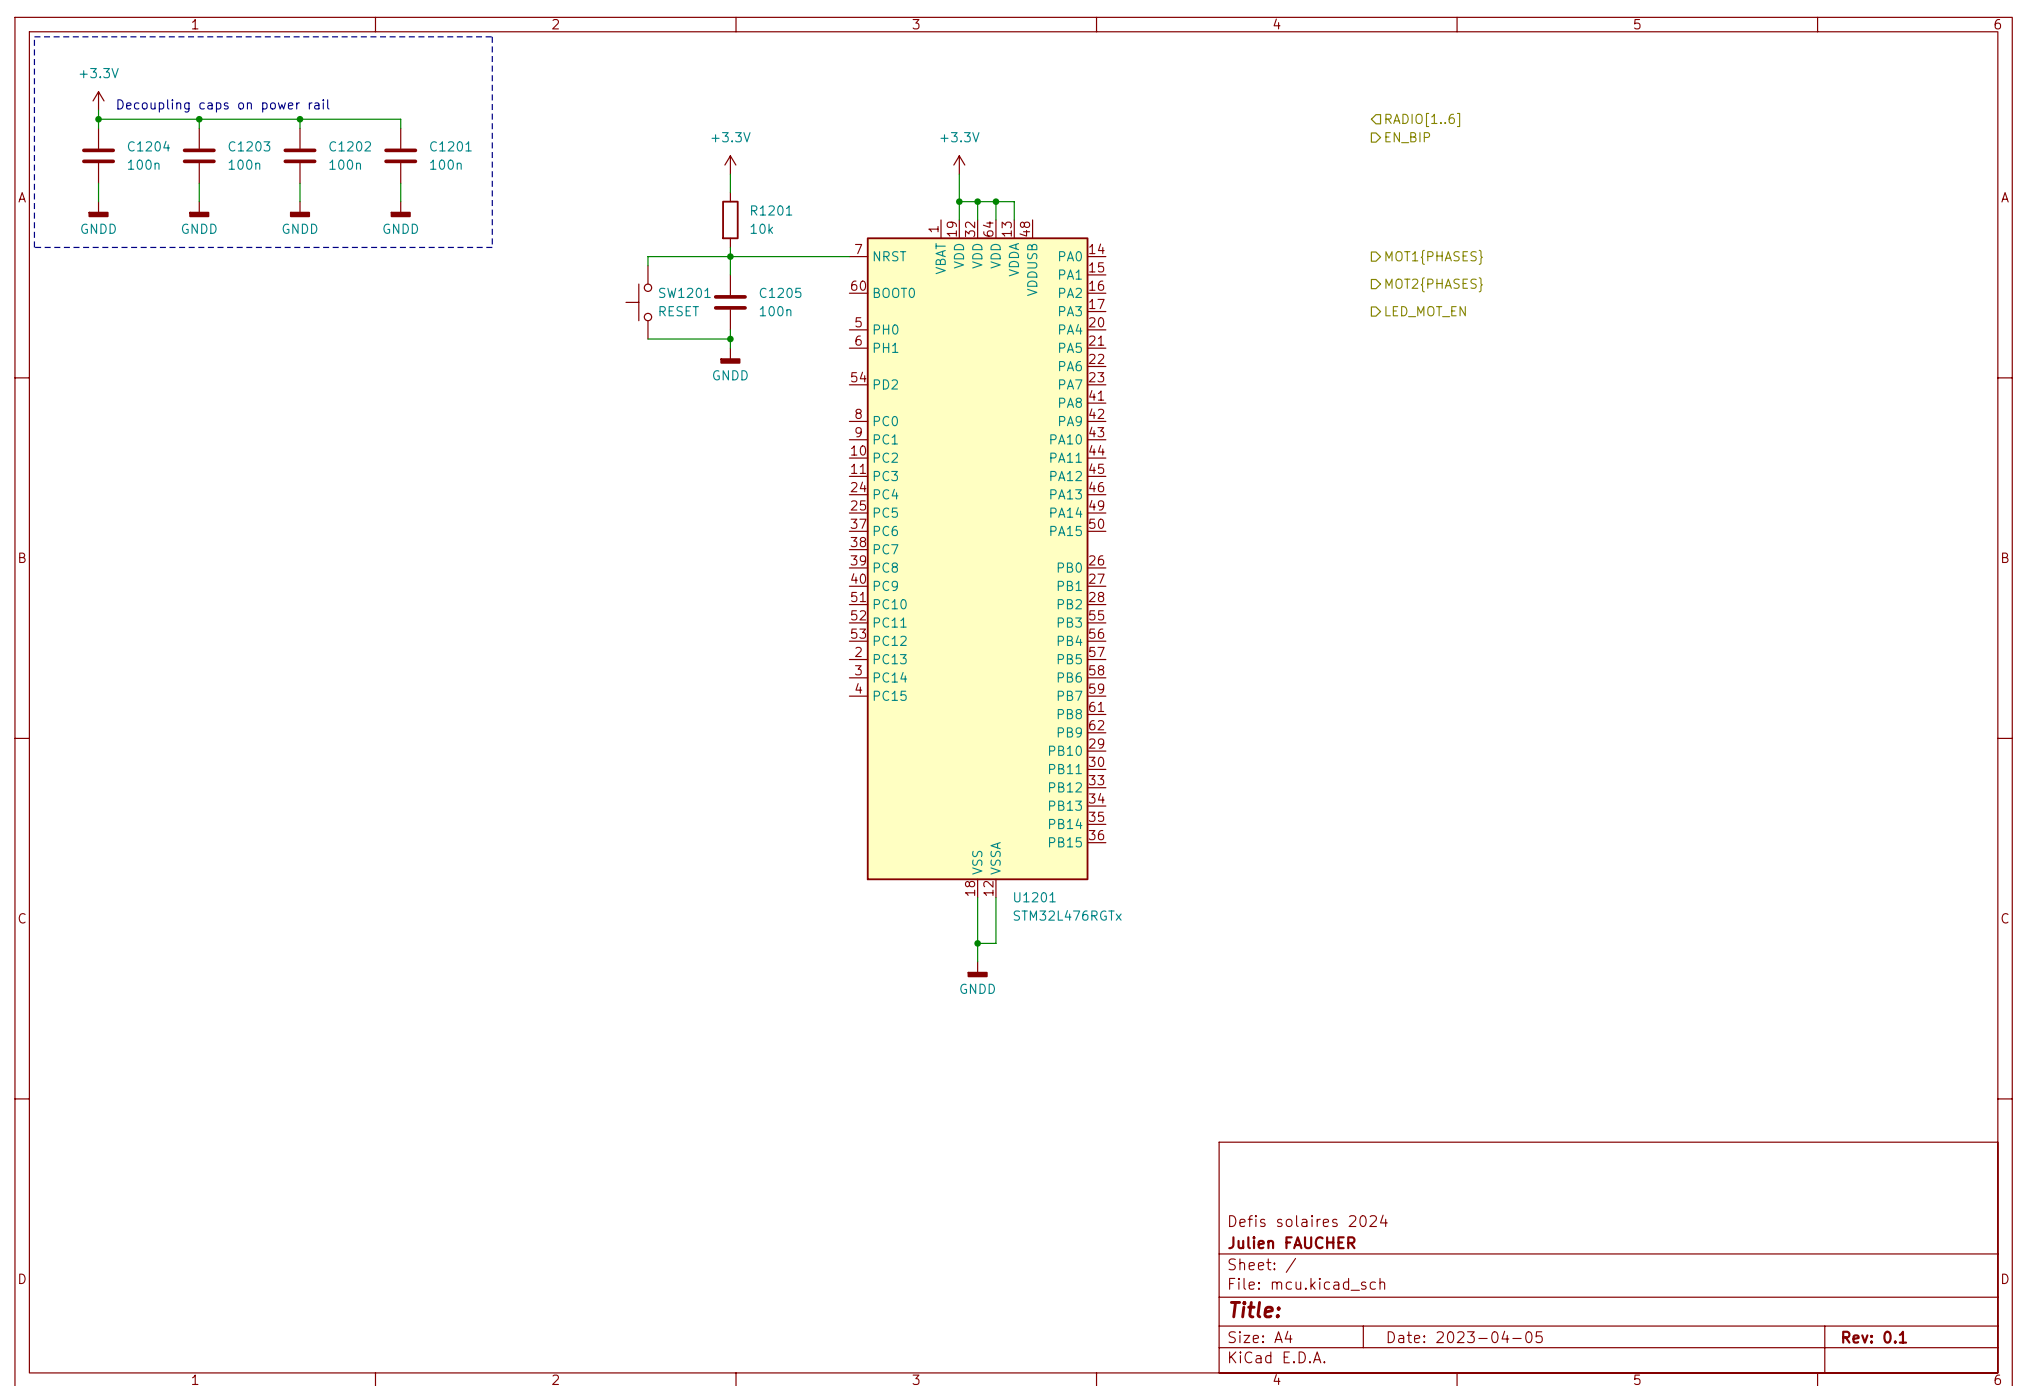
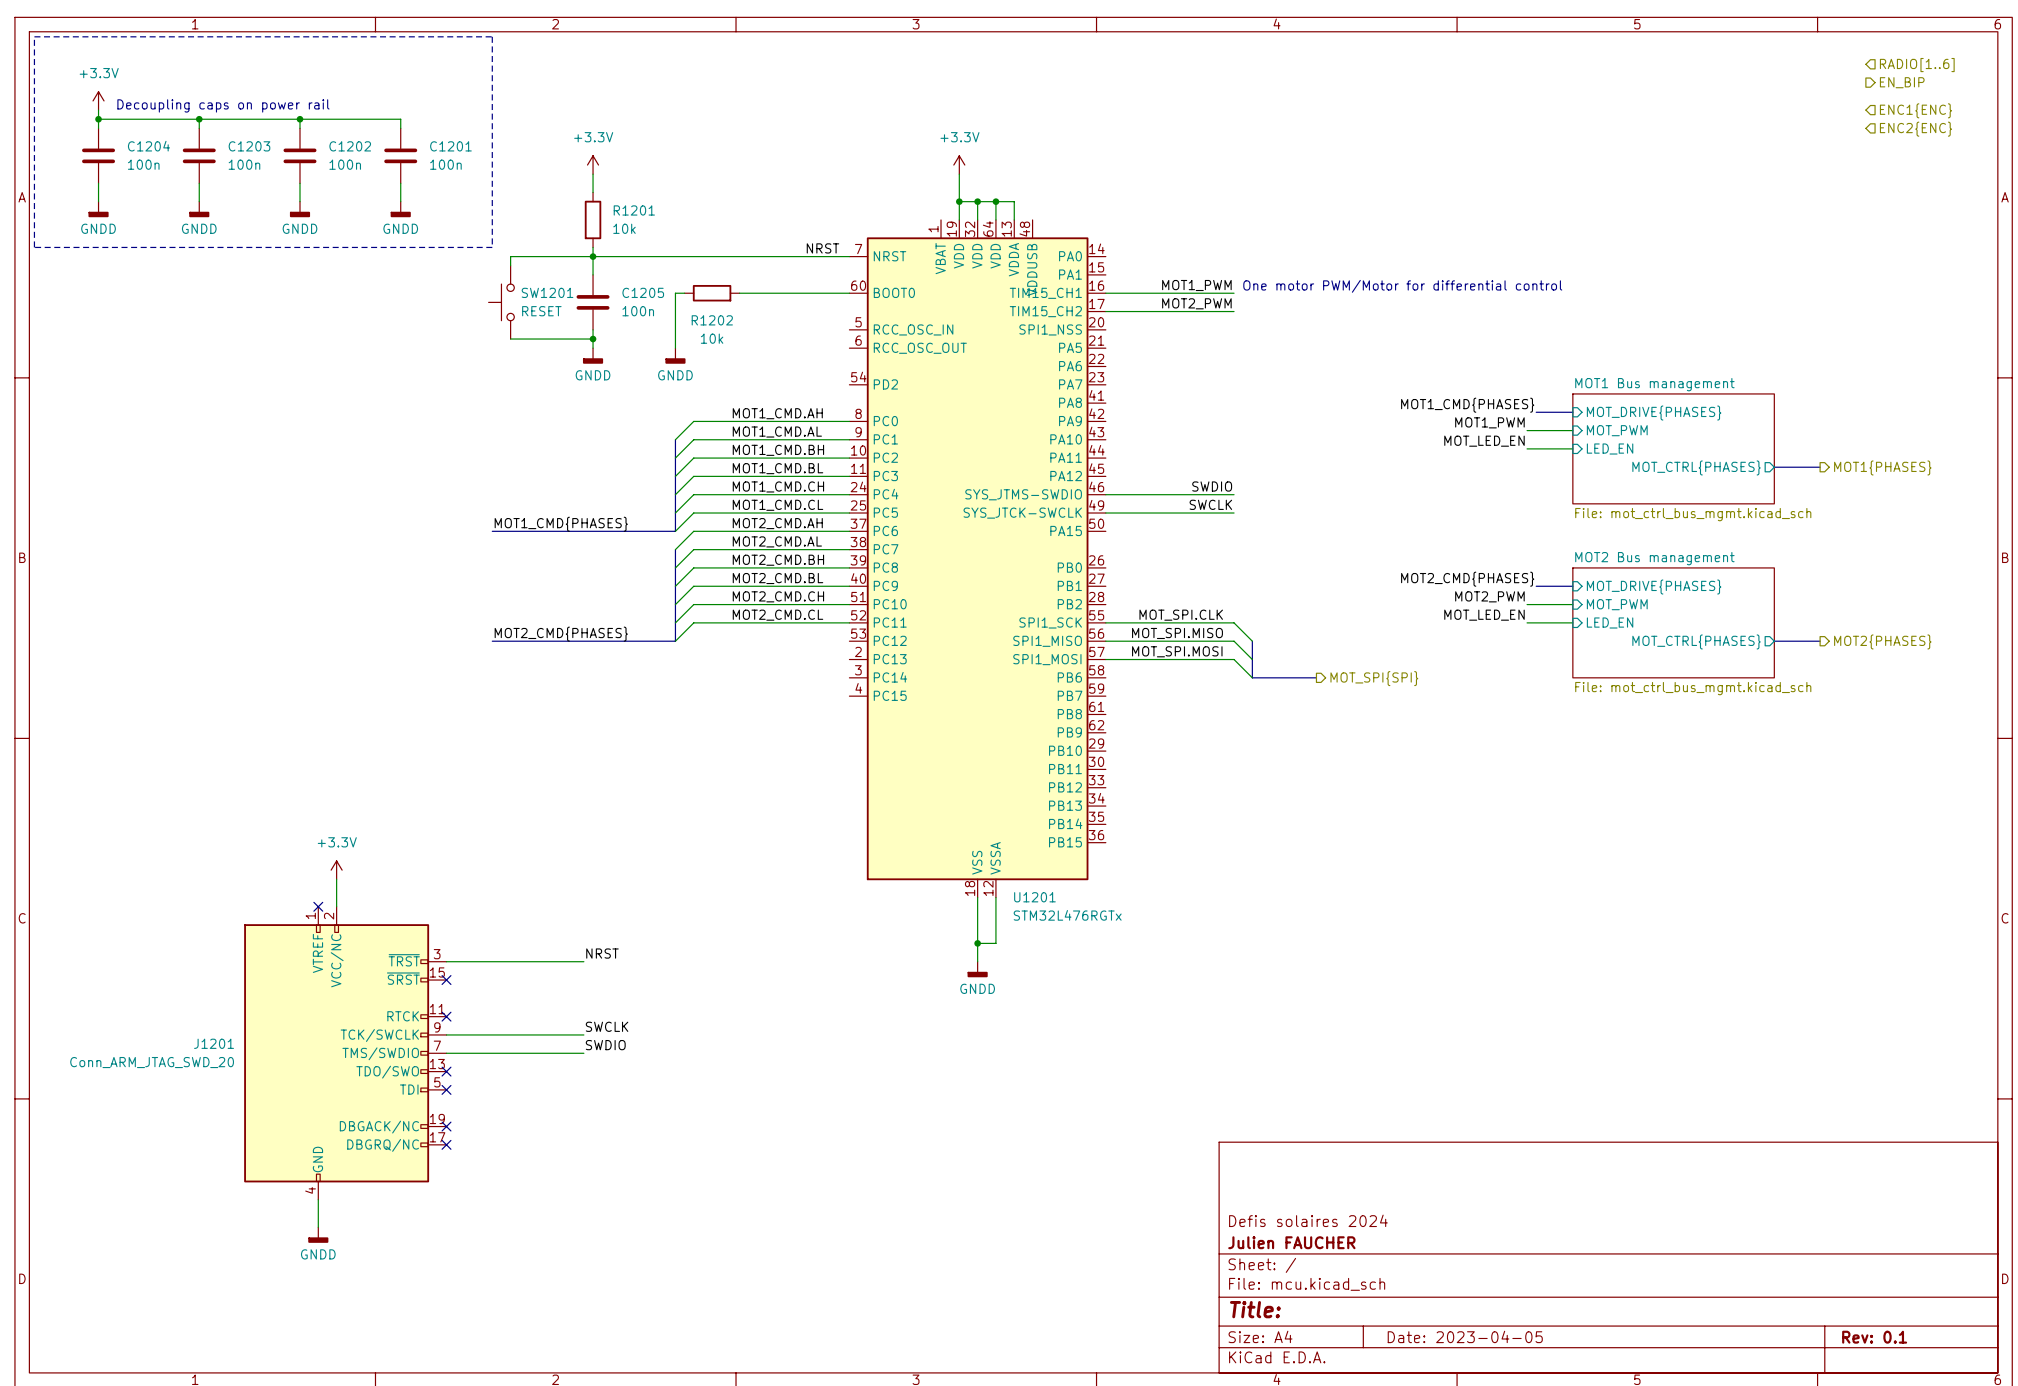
hierarchical label: none -> RADIO[1..6] (1917, 65)
hierarchical label: none -> EN_BIP (1902, 82)
hierarchical label: none -> ENC1{ENC} (1915, 110)
hierarchical label: RADIO[1..6] (1422, 119) -> none
hierarchical label: none -> ENC2{ENC} (1915, 129)
hierarchical label: EN_BIP (1407, 137) -> none
power symbol position: +3.3V (730, 165) -> +3.3V (593, 165)
wire: (730, 174) (730, 192) -> (593, 174) (593, 192)
R1201 position: (730, 219) -> (593, 219)
U1201 symbol: [849, 219, 1106, 898] -> [849, 219, 1106, 898]
wire: (730, 247) (730, 274) -> (593, 247) (593, 274)
label: none -> NRST (822, 248)
junction: none -> (593, 256)
wire: (647, 256) (647, 265) -> (647, 256) (510, 256) (510, 265)
junction: (730, 256) -> none
hierarchical label: MOT1{PHASES} (1434, 257) -> none
hierarchical label: MOT2{PHASES} (1434, 284) -> none
label: none -> MOT1_PWM (1196, 285)
text: none -> One motor PWM/Motor for differential control (1402, 286)
wire: none -> (684, 293) (675, 293) (675, 348)
R1202: none -> 10k (712, 293)
wire: none -> (739, 293) (849, 293)
wire: none -> (1105, 293) (1234, 293)
SW1201 position: (638, 302) -> (501, 302)
C1205 position: (730, 302) -> (593, 302)
label: none -> MOT2_PWM (1196, 303)
wire: none -> (1105, 311) (1234, 311)
hierarchical label: LED_MOT_EN (1425, 311) -> none
wire: (730, 329) (730, 348) -> (593, 329) (593, 348)
junction: none -> (593, 339)
wire: (647, 339) (730, 339) -> (510, 339) (593, 339)
junction: (730, 339) -> none
power symbol: none -> GNDD (593, 355)
power symbol position: GNDD (730, 355) -> GNDD (675, 355)
label: none -> MOT1_CMD{PHASES} (1467, 405)
bus: none -> (1536, 412) (1572, 412)
label: none -> MOT1_CMD.AH (777, 413)
sheet pin: none -> MOT_DRIVE{PHASES} (1654, 413)
wire: none -> (849, 421) (693, 421) (675, 439)
label: none -> MOT1_PWM (1489, 422)
wire: none -> (1527, 430) (1572, 430)
sheet pin: none -> MOT_PWM (1617, 430)
label: none -> MOT1_CMD.AL (777, 432)
bus: none -> (675, 439) (675, 531) (492, 531)
wire: none -> (849, 439) (693, 439) (675, 458)
label: none -> MOT_LED_EN (1484, 441)
wire: none -> (1527, 448) (1572, 448)
sheet pin: none -> LED_EN (1610, 448)
sheet MOT1 Bus management: none -> File: mot_ctrl_bus_mgmt.kicad_sch (1673, 448)
label: none -> MOT1_CMD.BH (778, 450)
wire: none -> (849, 458) (693, 458) (675, 476)
sheet pin: none -> MOT_CTRL{PHASES} (1696, 467)
bus: none -> (1774, 467) (1820, 467)
hierarchical label: none -> MOT1{PHASES} (1882, 467)
label: none -> MOT1_CMD.BL (777, 468)
wire: none -> (849, 476) (693, 476) (675, 494)
label: none -> MOT1_CMD.CH (778, 486)
label: none -> SWDIO (1212, 486)
wire: none -> (849, 494) (693, 494) (675, 513)
wire: none -> (1105, 494) (1234, 494)
label: none -> SWCLK (1210, 504)
label: none -> MOT1_CMD.CL (777, 505)
wire: none -> (849, 513) (693, 513) (675, 531)
wire: none -> (1105, 513) (1234, 513)
label: none -> MOT2_CMD.AH (777, 523)
label: none -> MOT1_CMD{PHASES} (561, 524)
wire: none -> (849, 531) (693, 531) (675, 549)
label: none -> MOT2_CMD.AL (777, 541)
bus: none -> (675, 549) (675, 641) (492, 641)
wire: none -> (849, 549) (693, 549) (675, 567)
label: none -> MOT2_CMD.BH (778, 560)
wire: none -> (849, 567) (693, 567) (675, 586)
label: none -> MOT2_CMD.BL (777, 578)
label: none -> MOT2_CMD{PHASES} (1467, 579)
wire: none -> (849, 586) (693, 586) (675, 604)
bus: none -> (1536, 586) (1572, 586)
sheet pin: none -> MOT_DRIVE{PHASES} (1654, 587)
label: none -> MOT2_CMD.CH (778, 596)
label: none -> MOT2_PWM (1489, 596)
wire: none -> (849, 604) (693, 604) (675, 622)
wire: none -> (1527, 604) (1572, 604)
sheet pin: none -> MOT_PWM (1617, 604)
label: none -> MOT2_CMD.CL (777, 615)
label: none -> MOT_SPI.CLK (1181, 615)
label: none -> MOT_LED_EN (1484, 615)
wire: none -> (849, 622) (693, 622) (675, 641)
wire: none -> (1105, 622) (1234, 622) (1252, 641)
wire: none -> (1527, 622) (1572, 622)
sheet pin: none -> LED_EN (1610, 622)
sheet MOT2 Bus management: none -> File: mot_ctrl_bus_mgmt.kicad_sch (1673, 622)
label: none -> MOT_SPI.MISO (1177, 633)
label: none -> MOT2_CMD{PHASES} (561, 634)
wire: none -> (1105, 641) (1234, 641) (1252, 659)
bus: none -> (1252, 641) (1252, 677) (1316, 677)
sheet pin: none -> MOT_CTRL{PHASES} (1696, 641)
bus: none -> (1774, 641) (1820, 641)
hierarchical label: none -> MOT2{PHASES} (1882, 641)
label: none -> MOT_SPI.MOSI (1177, 651)
wire: none -> (1105, 659) (1234, 659) (1252, 677)
hierarchical label: none -> MOT_SPI{SPI} (1374, 678)
power symbol: none -> +3.3V (336, 870)
wire: none -> (336, 879) (336, 906)
no-connect mark: none -> (318, 906)
label: none -> NRST (602, 953)
wire: none -> (446, 961) (583, 961)
no-connect mark: none -> (446, 980)
no-connect mark: none -> (446, 1016)
label: none -> SWCLK (607, 1026)
wire: none -> (446, 1034) (583, 1034)
label: none -> SWDIO (605, 1045)
J1201: none -> Conn_ARM_JTAG_SWD_20 (345, 1053)
wire: none -> (446, 1053) (583, 1053)
no-connect mark: none -> (446, 1071)
no-connect mark: none -> (446, 1089)
no-connect mark: none -> (446, 1126)
no-connect mark: none -> (446, 1144)
wire: none -> (318, 1199) (318, 1227)
power symbol: none -> GNDD (318, 1235)

